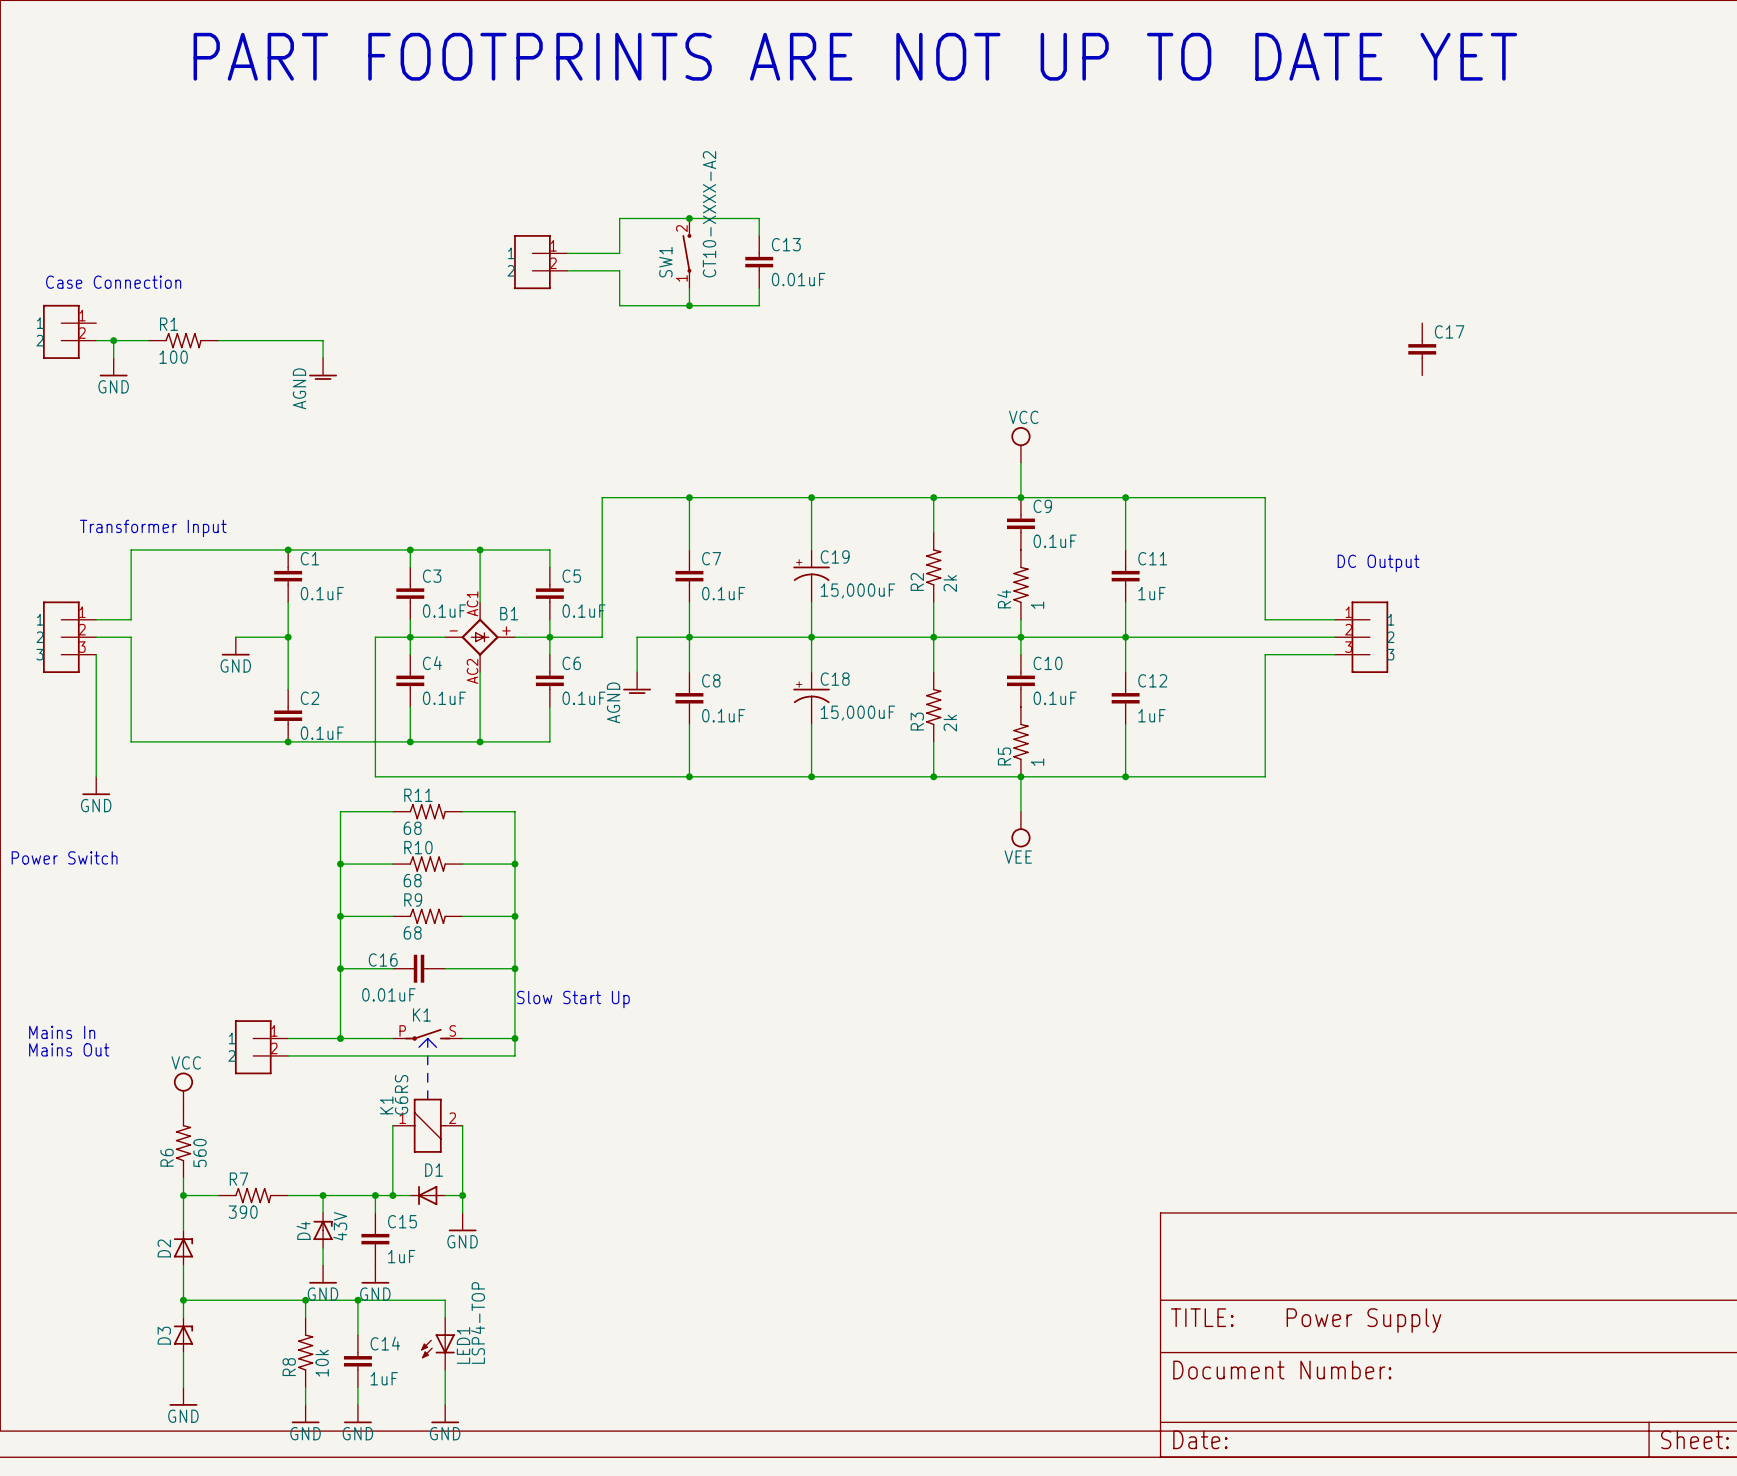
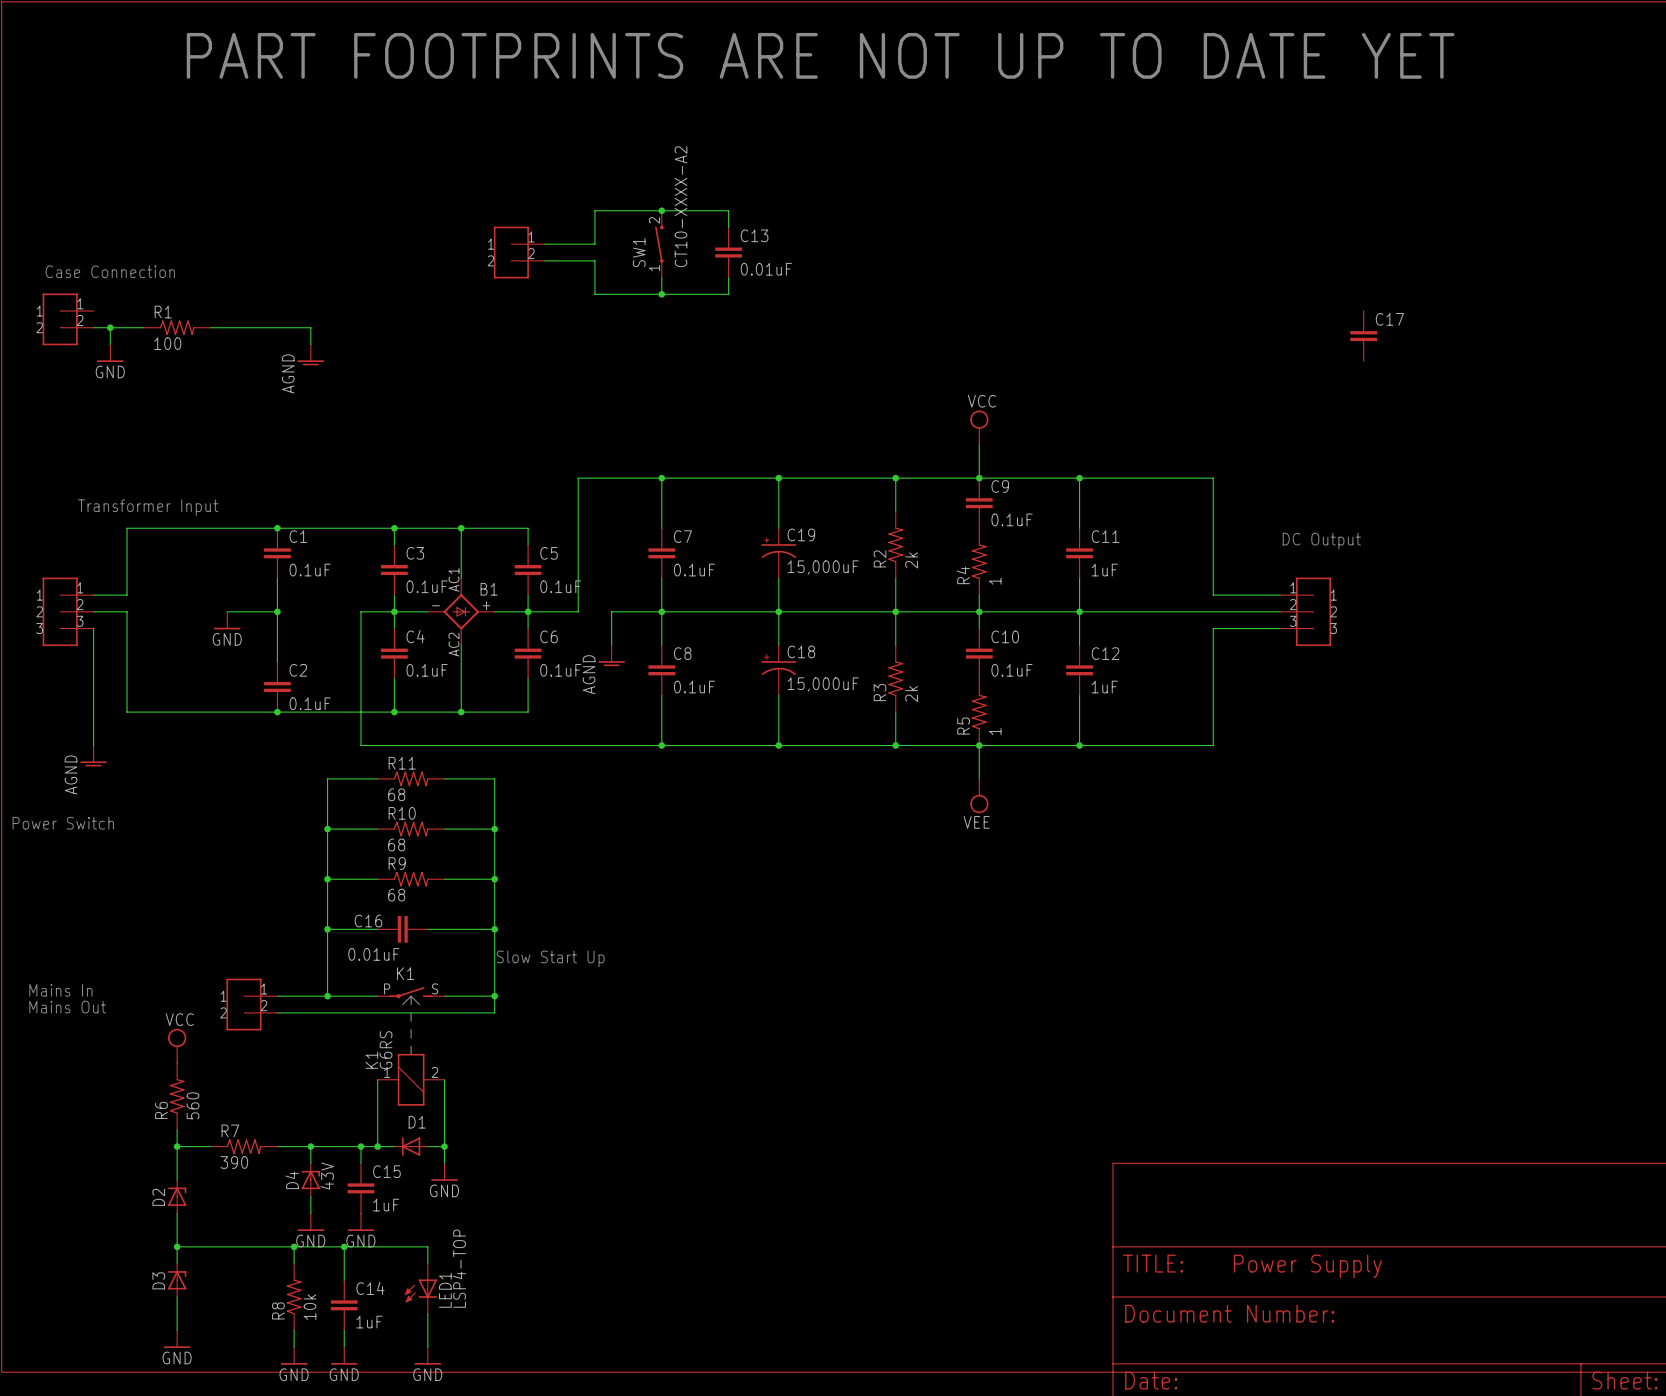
power symbol: GND (96, 785) -> AGND (93, 755)

